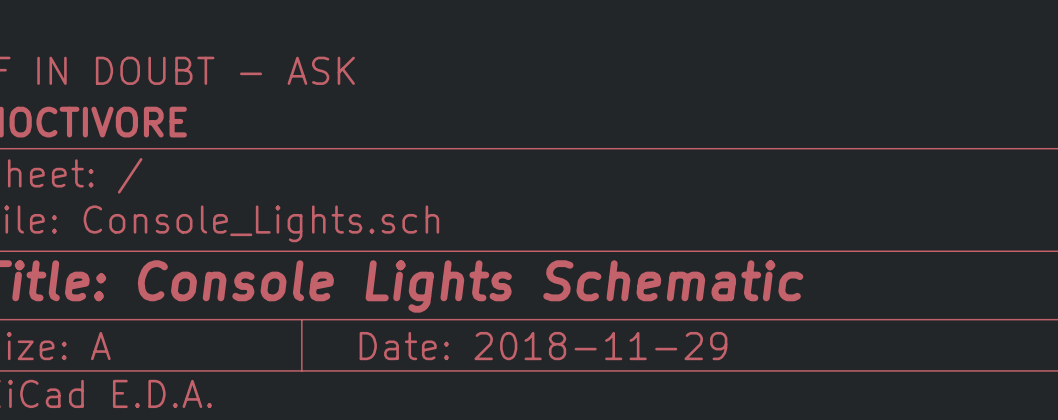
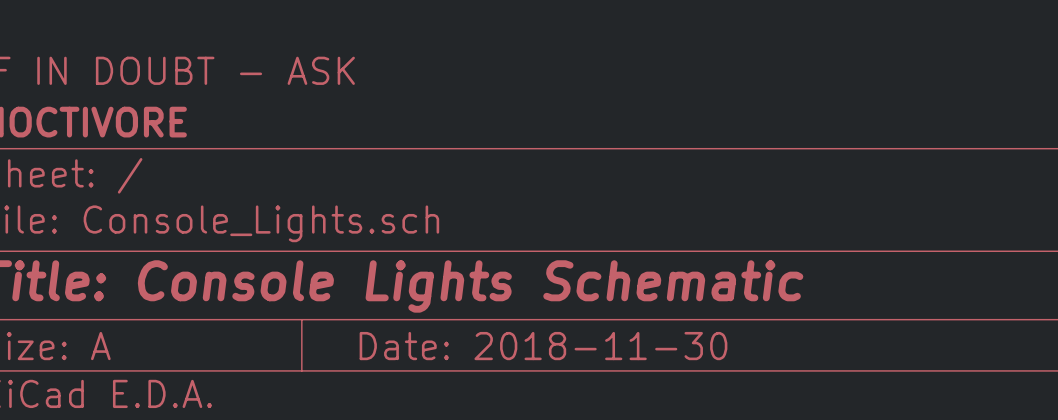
title block: Date: 2018-11-29 (543, 346) -> Date: 2018-11-30 (543, 346)

